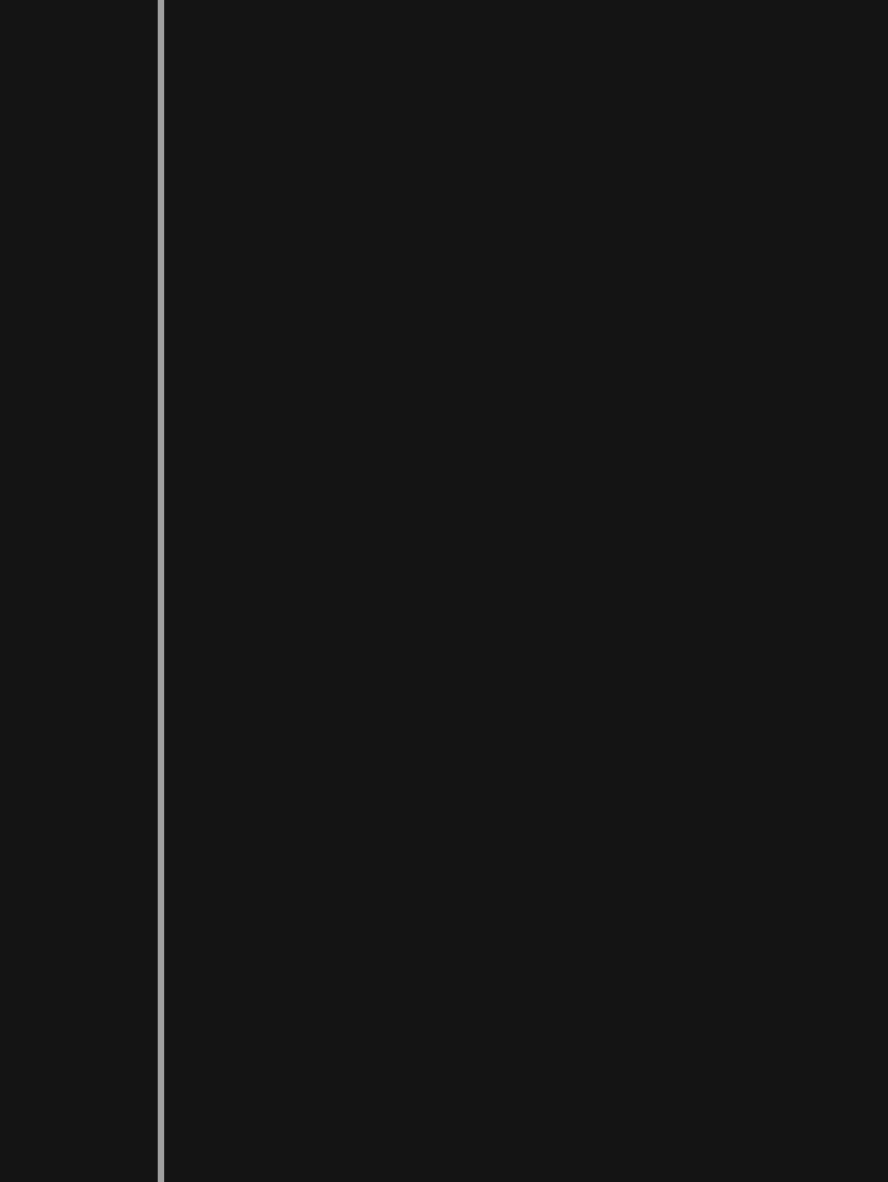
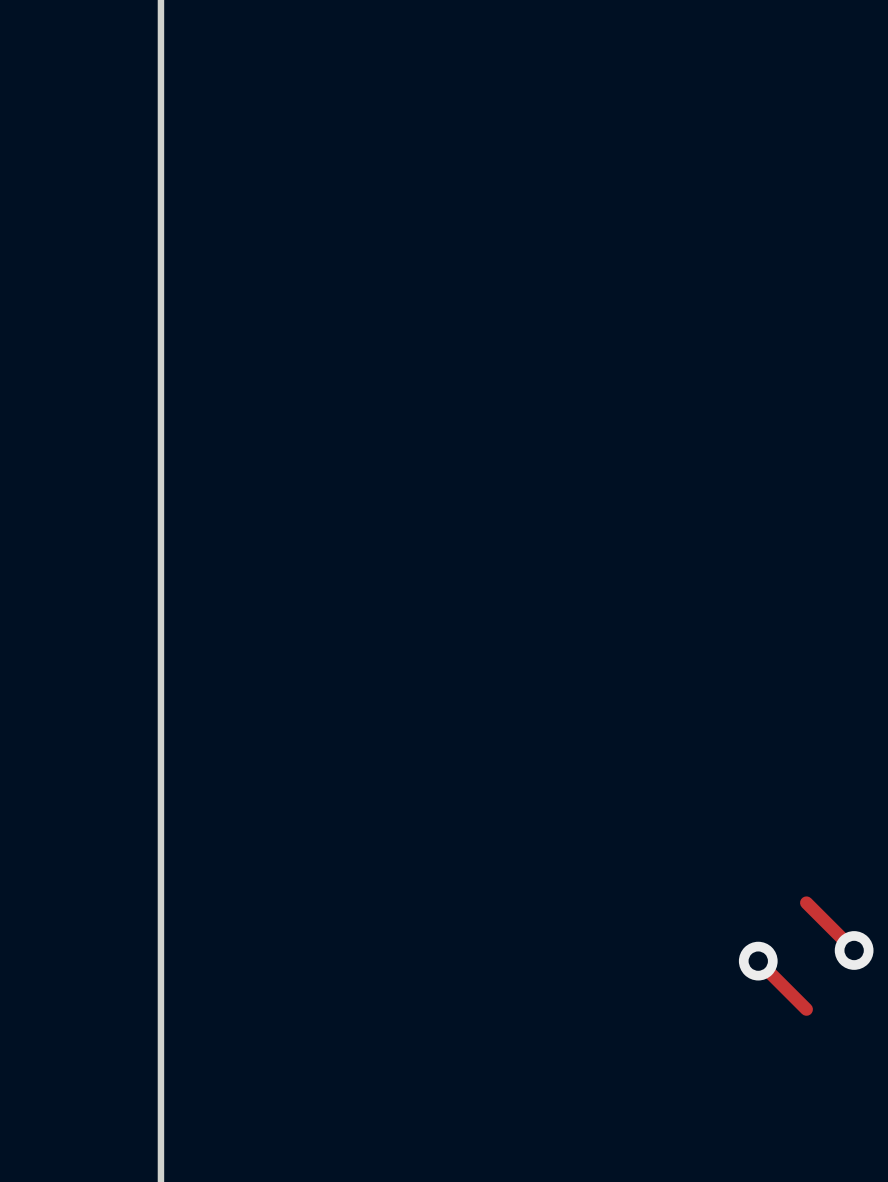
track: none -> (806, 902) (854, 950)
via: none -> (854, 950)
track: none -> (758, 961) (806, 1009)
via: none -> (758, 961)

